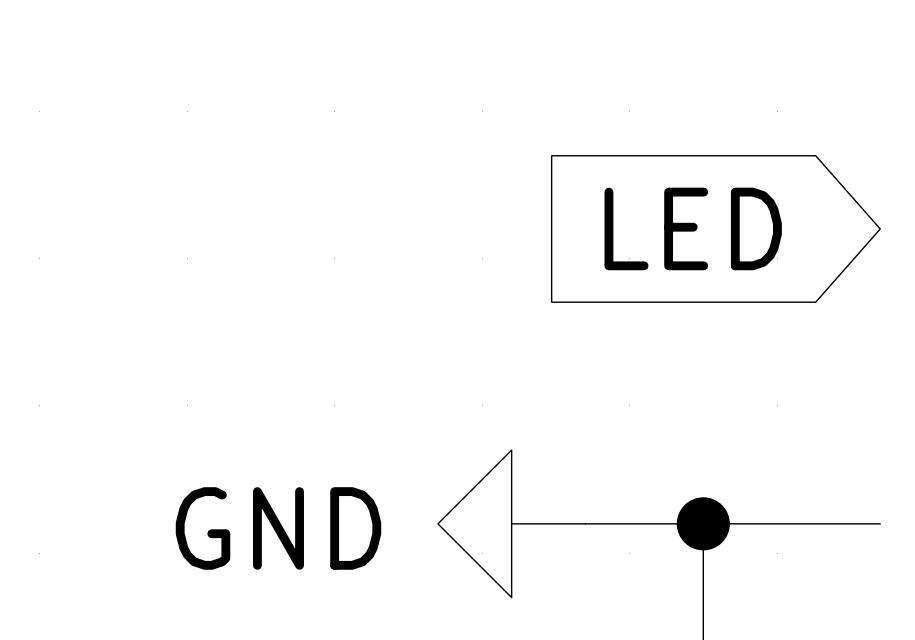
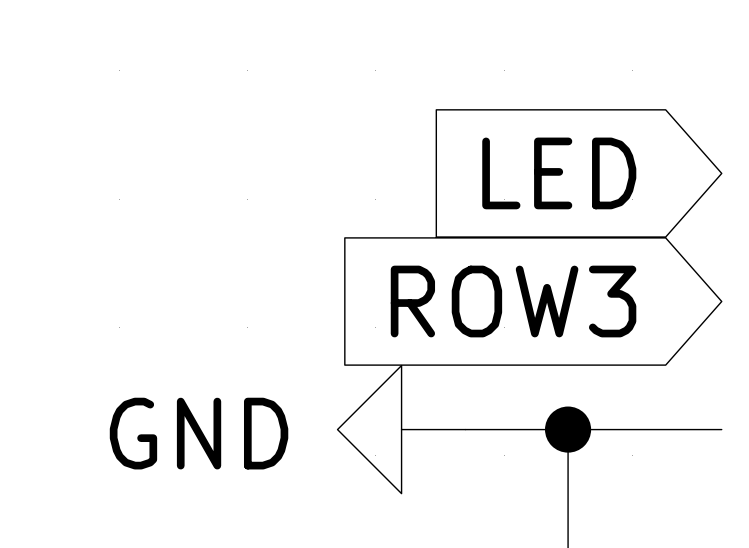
global label: none -> ROW3 (513, 301)

